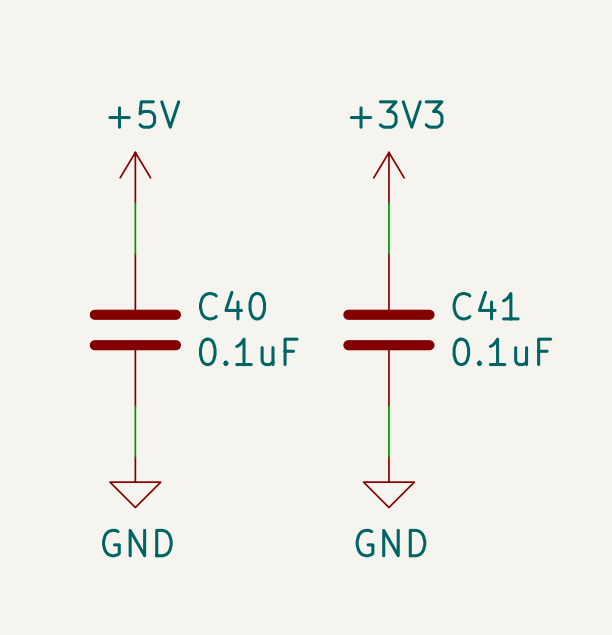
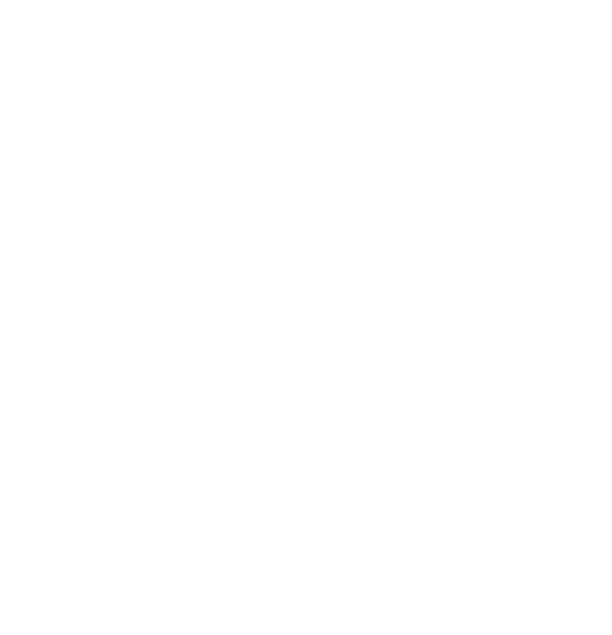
power symbol: +5V (135, 177) -> none
power symbol: +3V3 (388, 177) -> none
wire: (135, 203) (135, 253) -> none
wire: (388, 203) (388, 253) -> none
C40: 0.1uF (135, 329) -> none
C41: 0.1uF (388, 329) -> none
wire: (135, 406) (135, 456) -> none
wire: (388, 406) (388, 456) -> none
power symbol: GND (135, 482) -> none
power symbol: GND (388, 482) -> none

